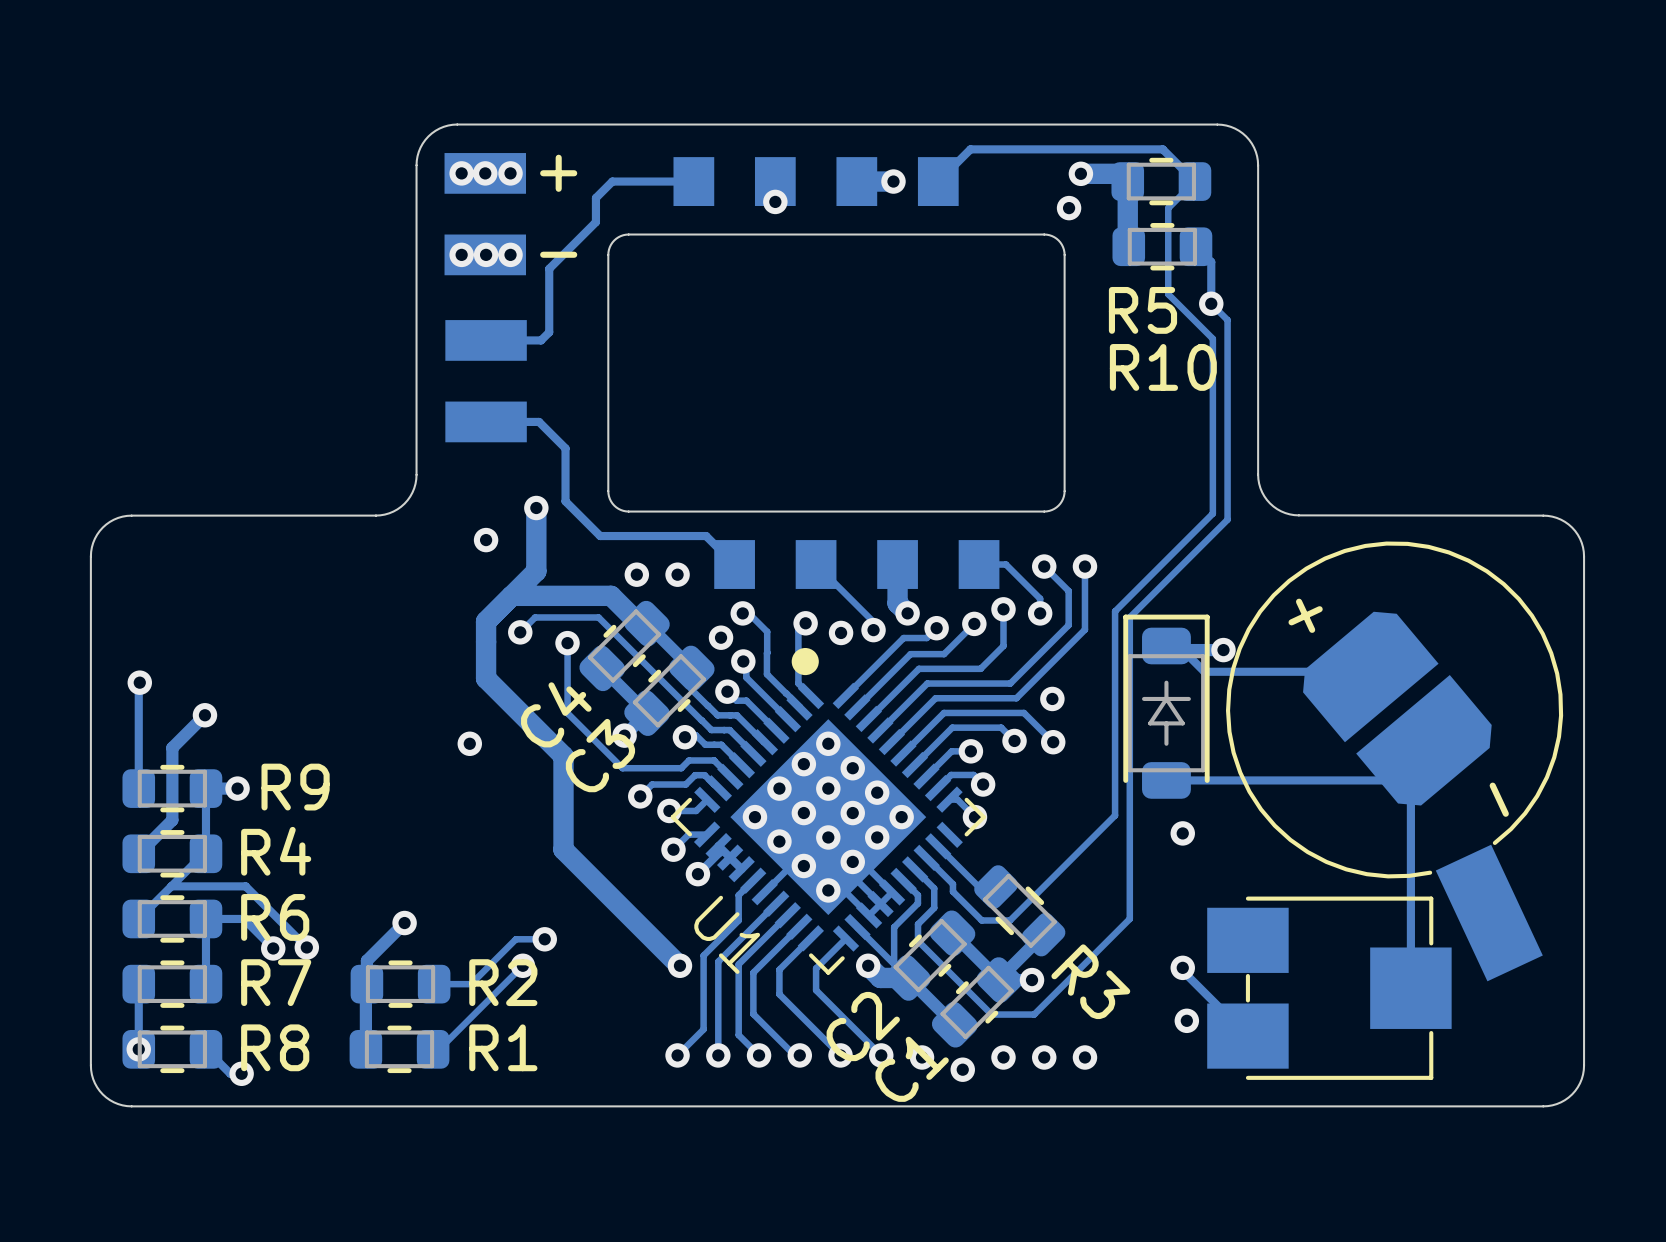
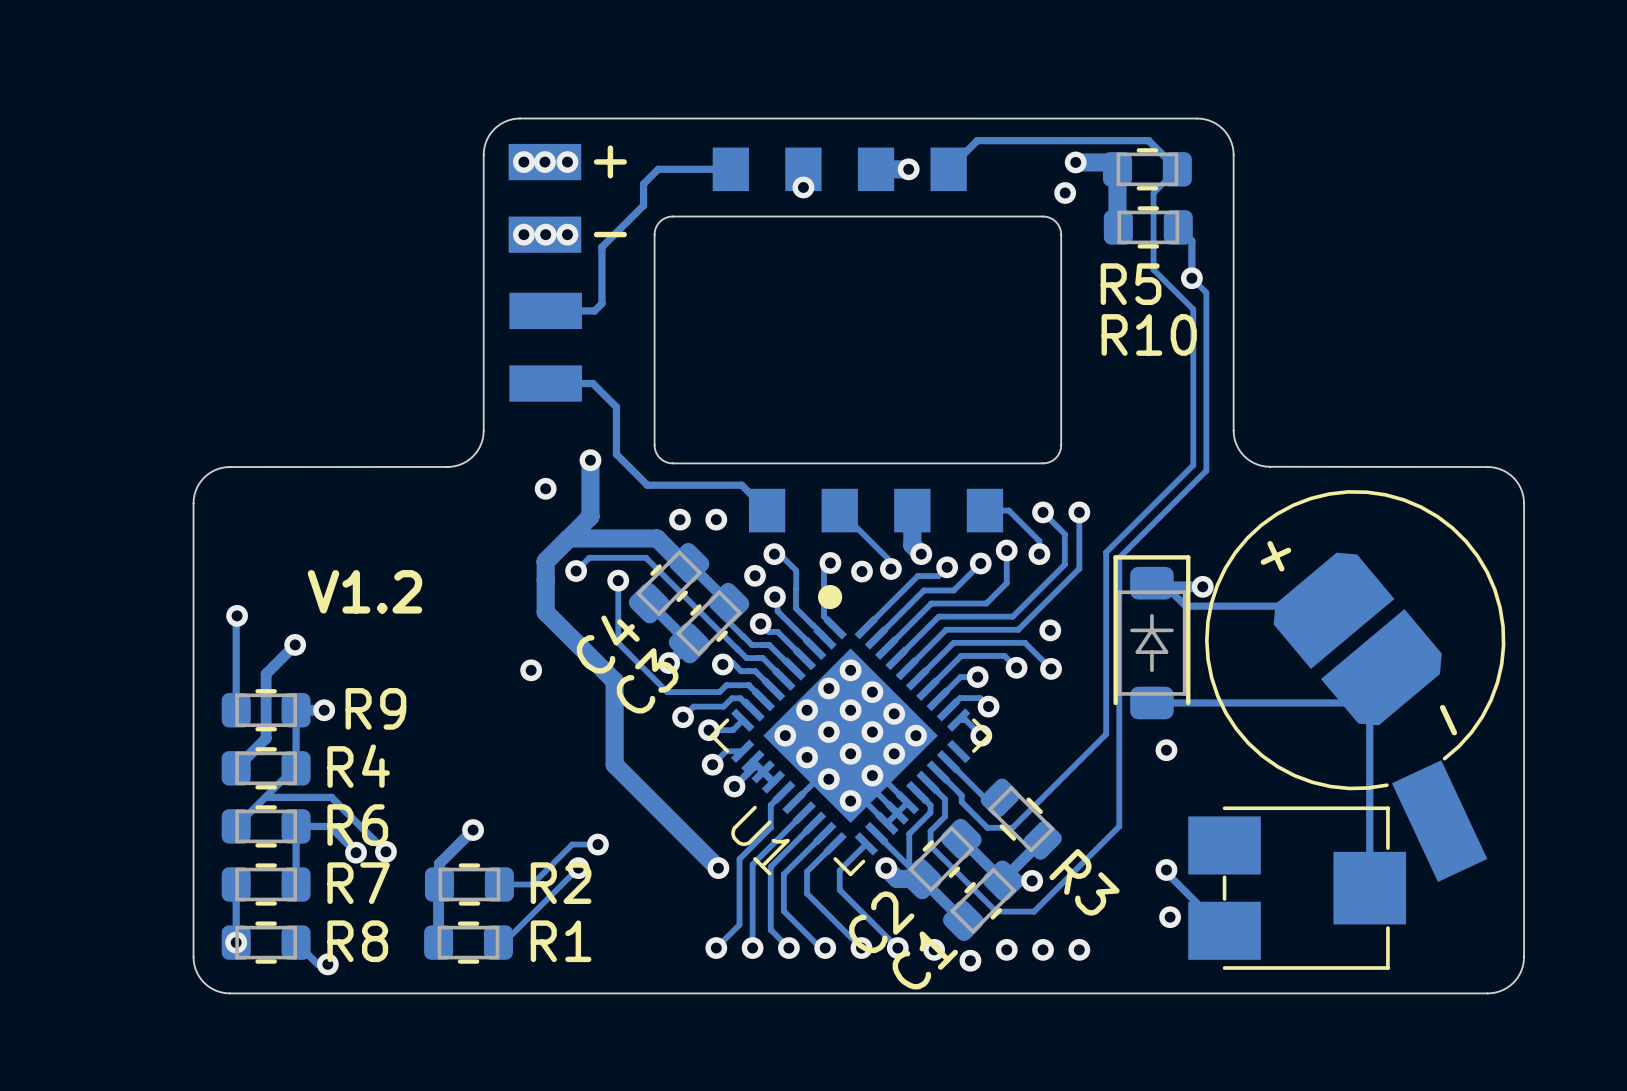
text: none -> V1.2 (365, 591)

